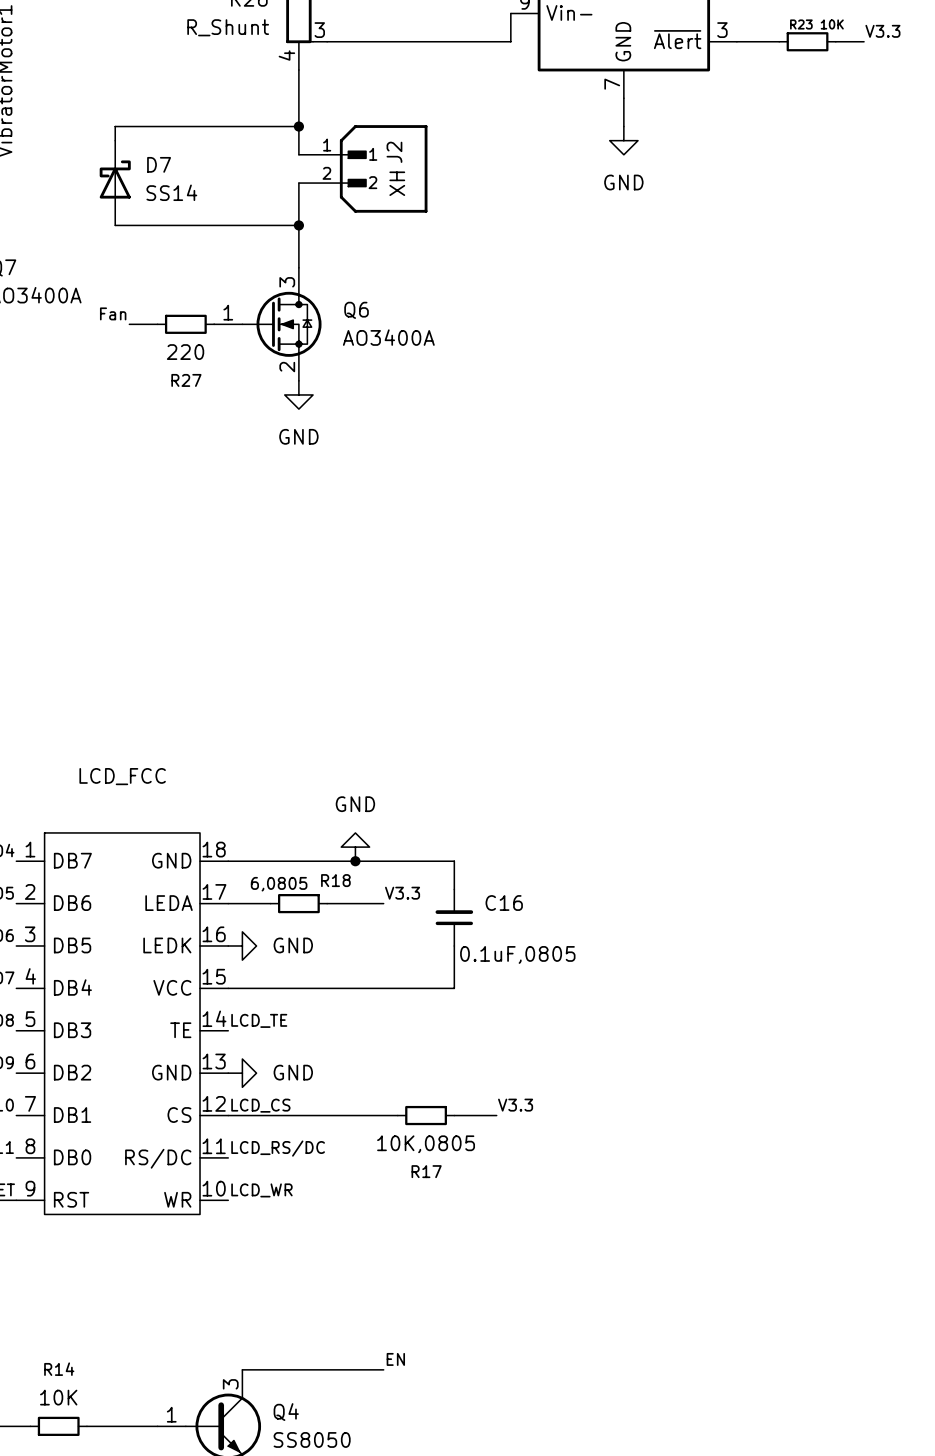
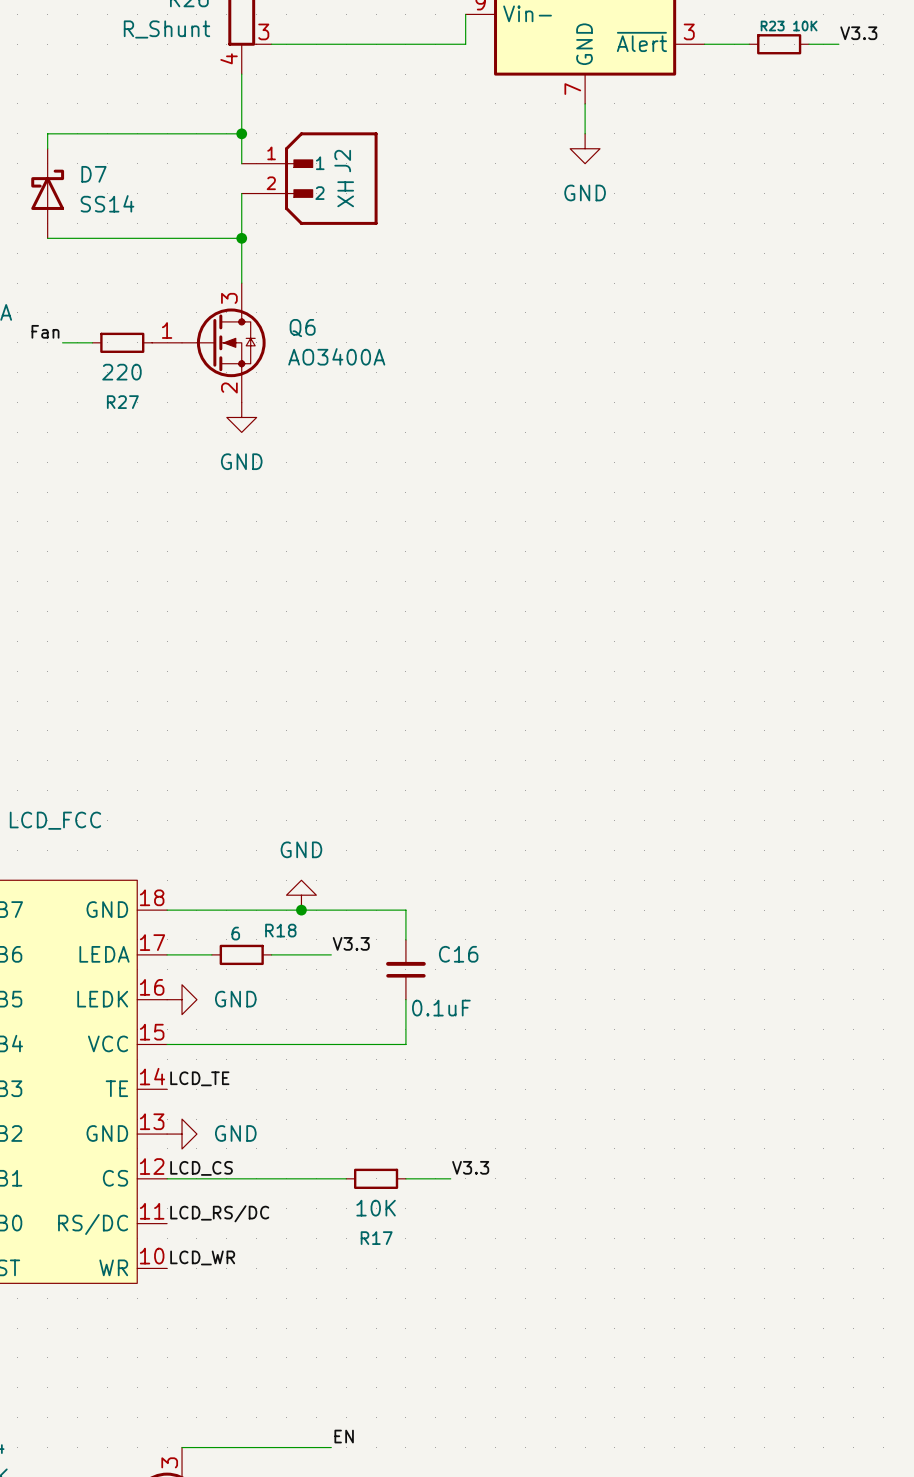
R18 value: 6,0805 (279, 884) -> 6 (235, 933)
C16 value: 0.1uF,0805 (517, 954) -> 0.1uF (441, 1008)
R17 value: 10K,0805 (426, 1144) -> 10K (376, 1208)

